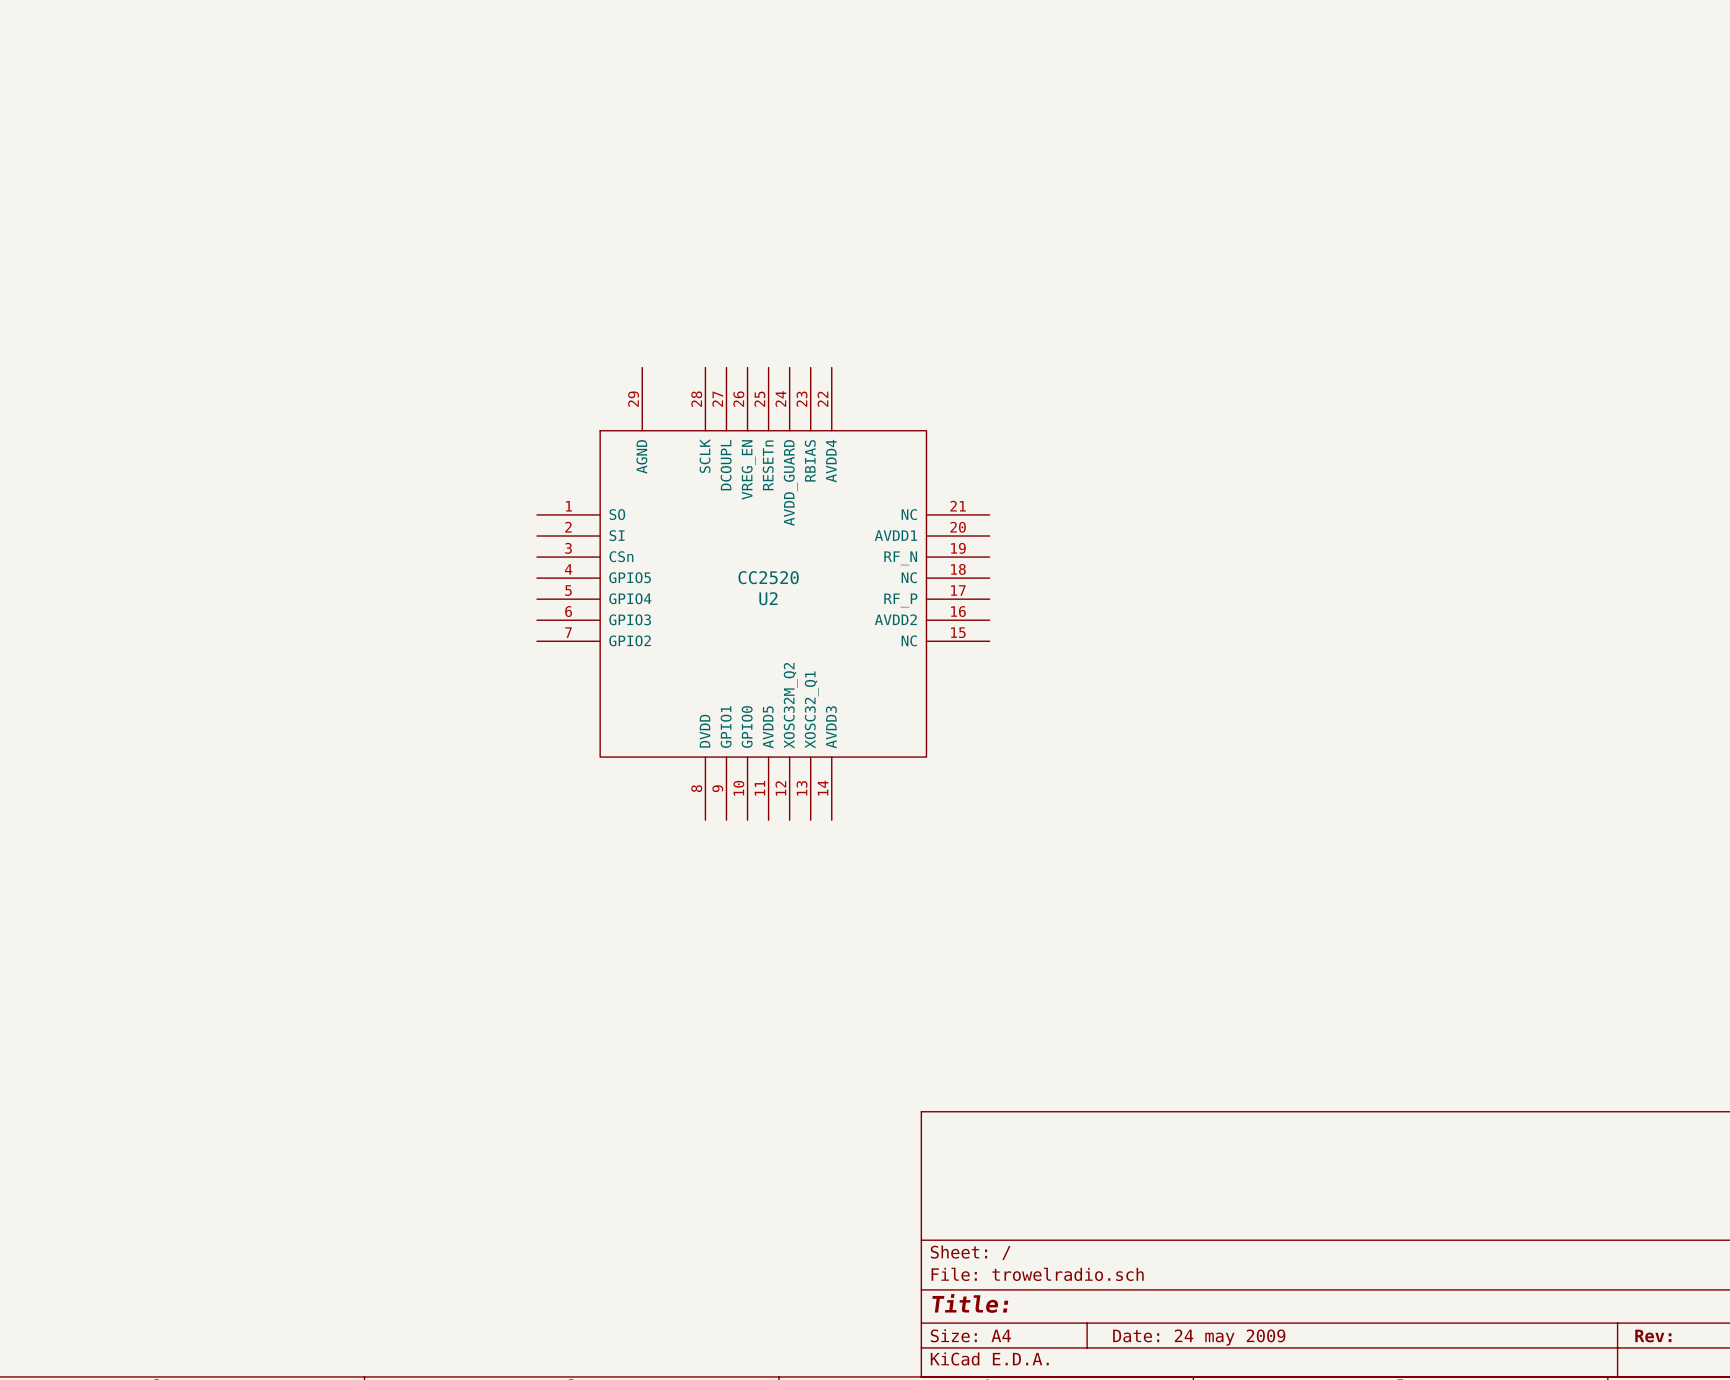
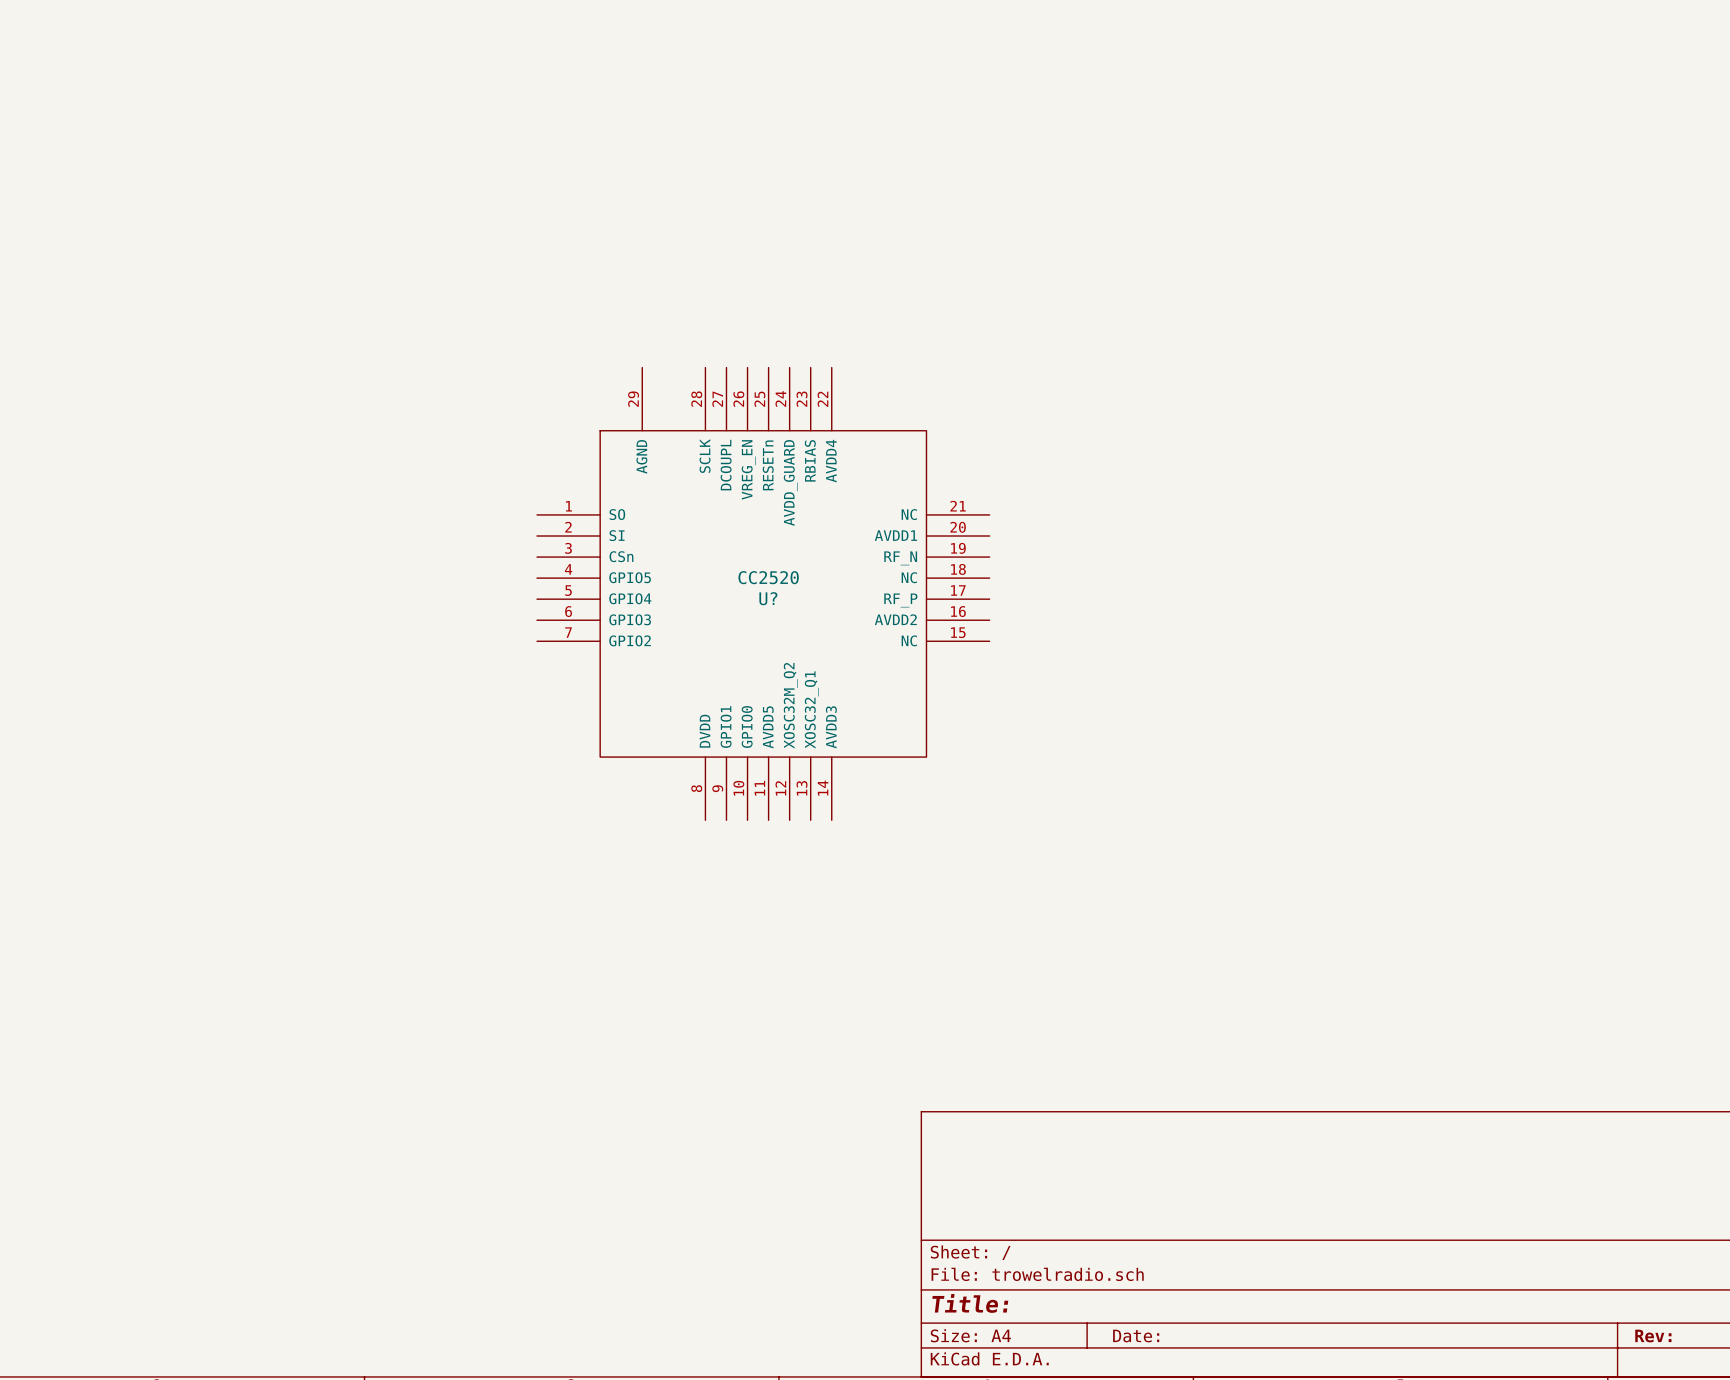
U2 name: U2 (768, 598) -> U? (768, 598)
title block: Date: 24 may 2009 (1199, 1337) -> Date: (1136, 1336)

